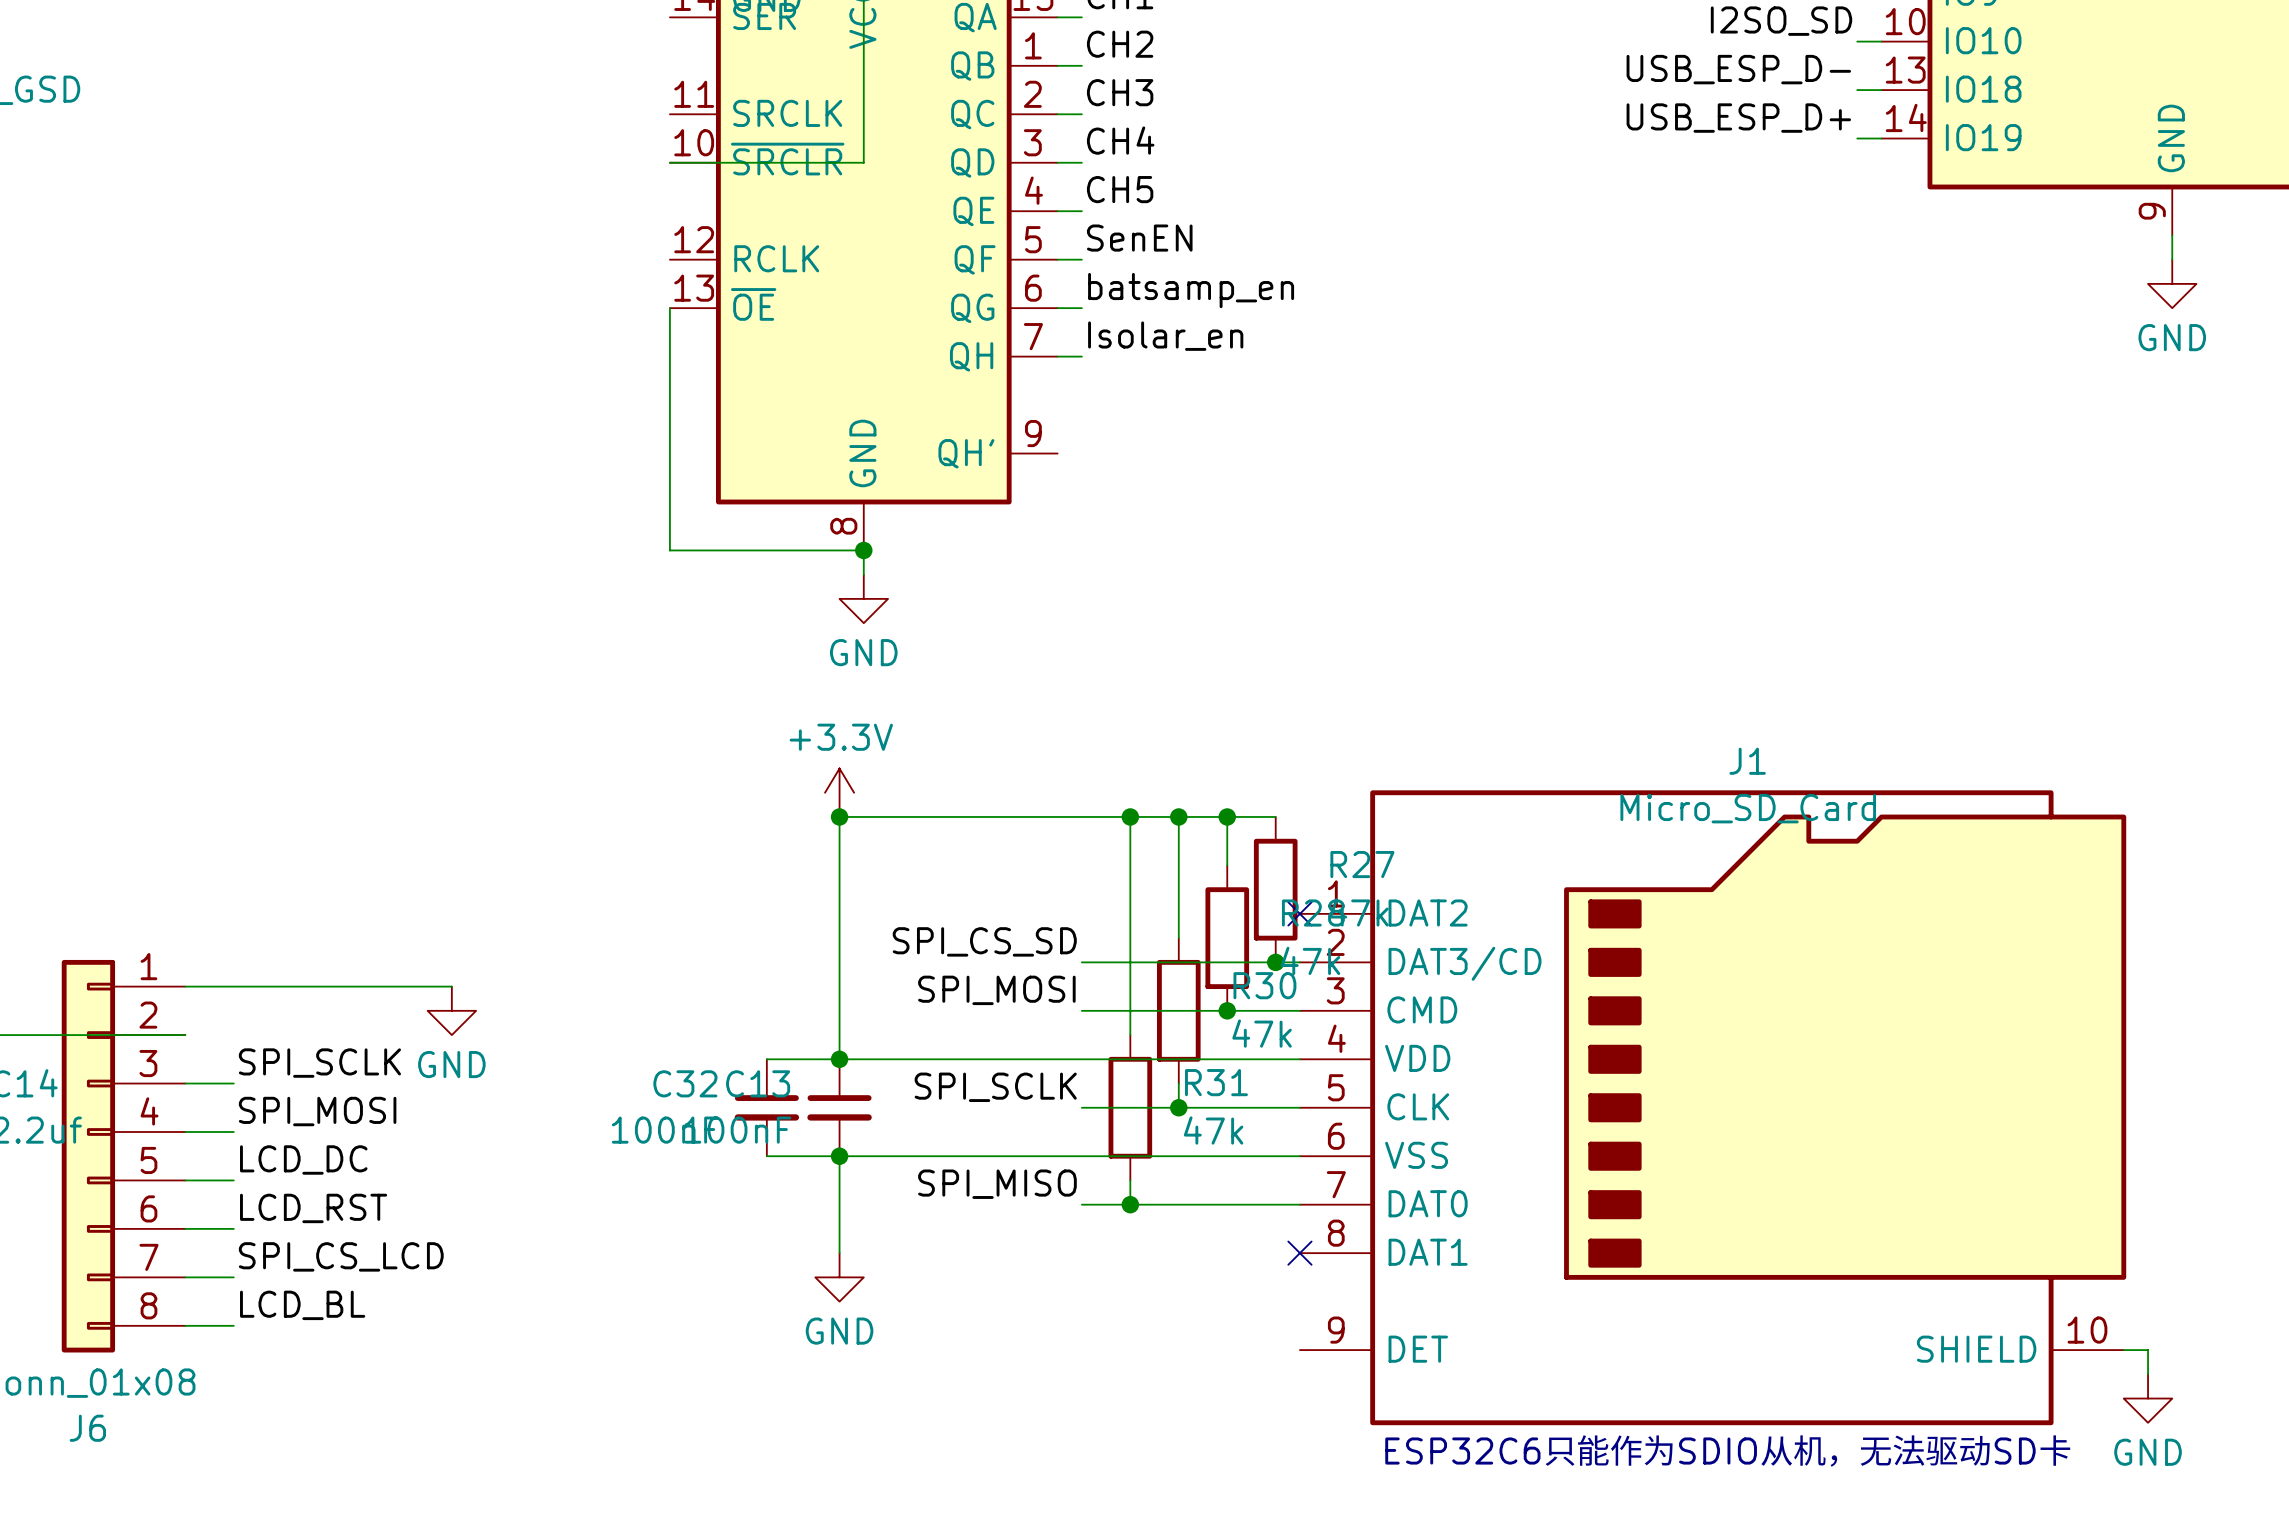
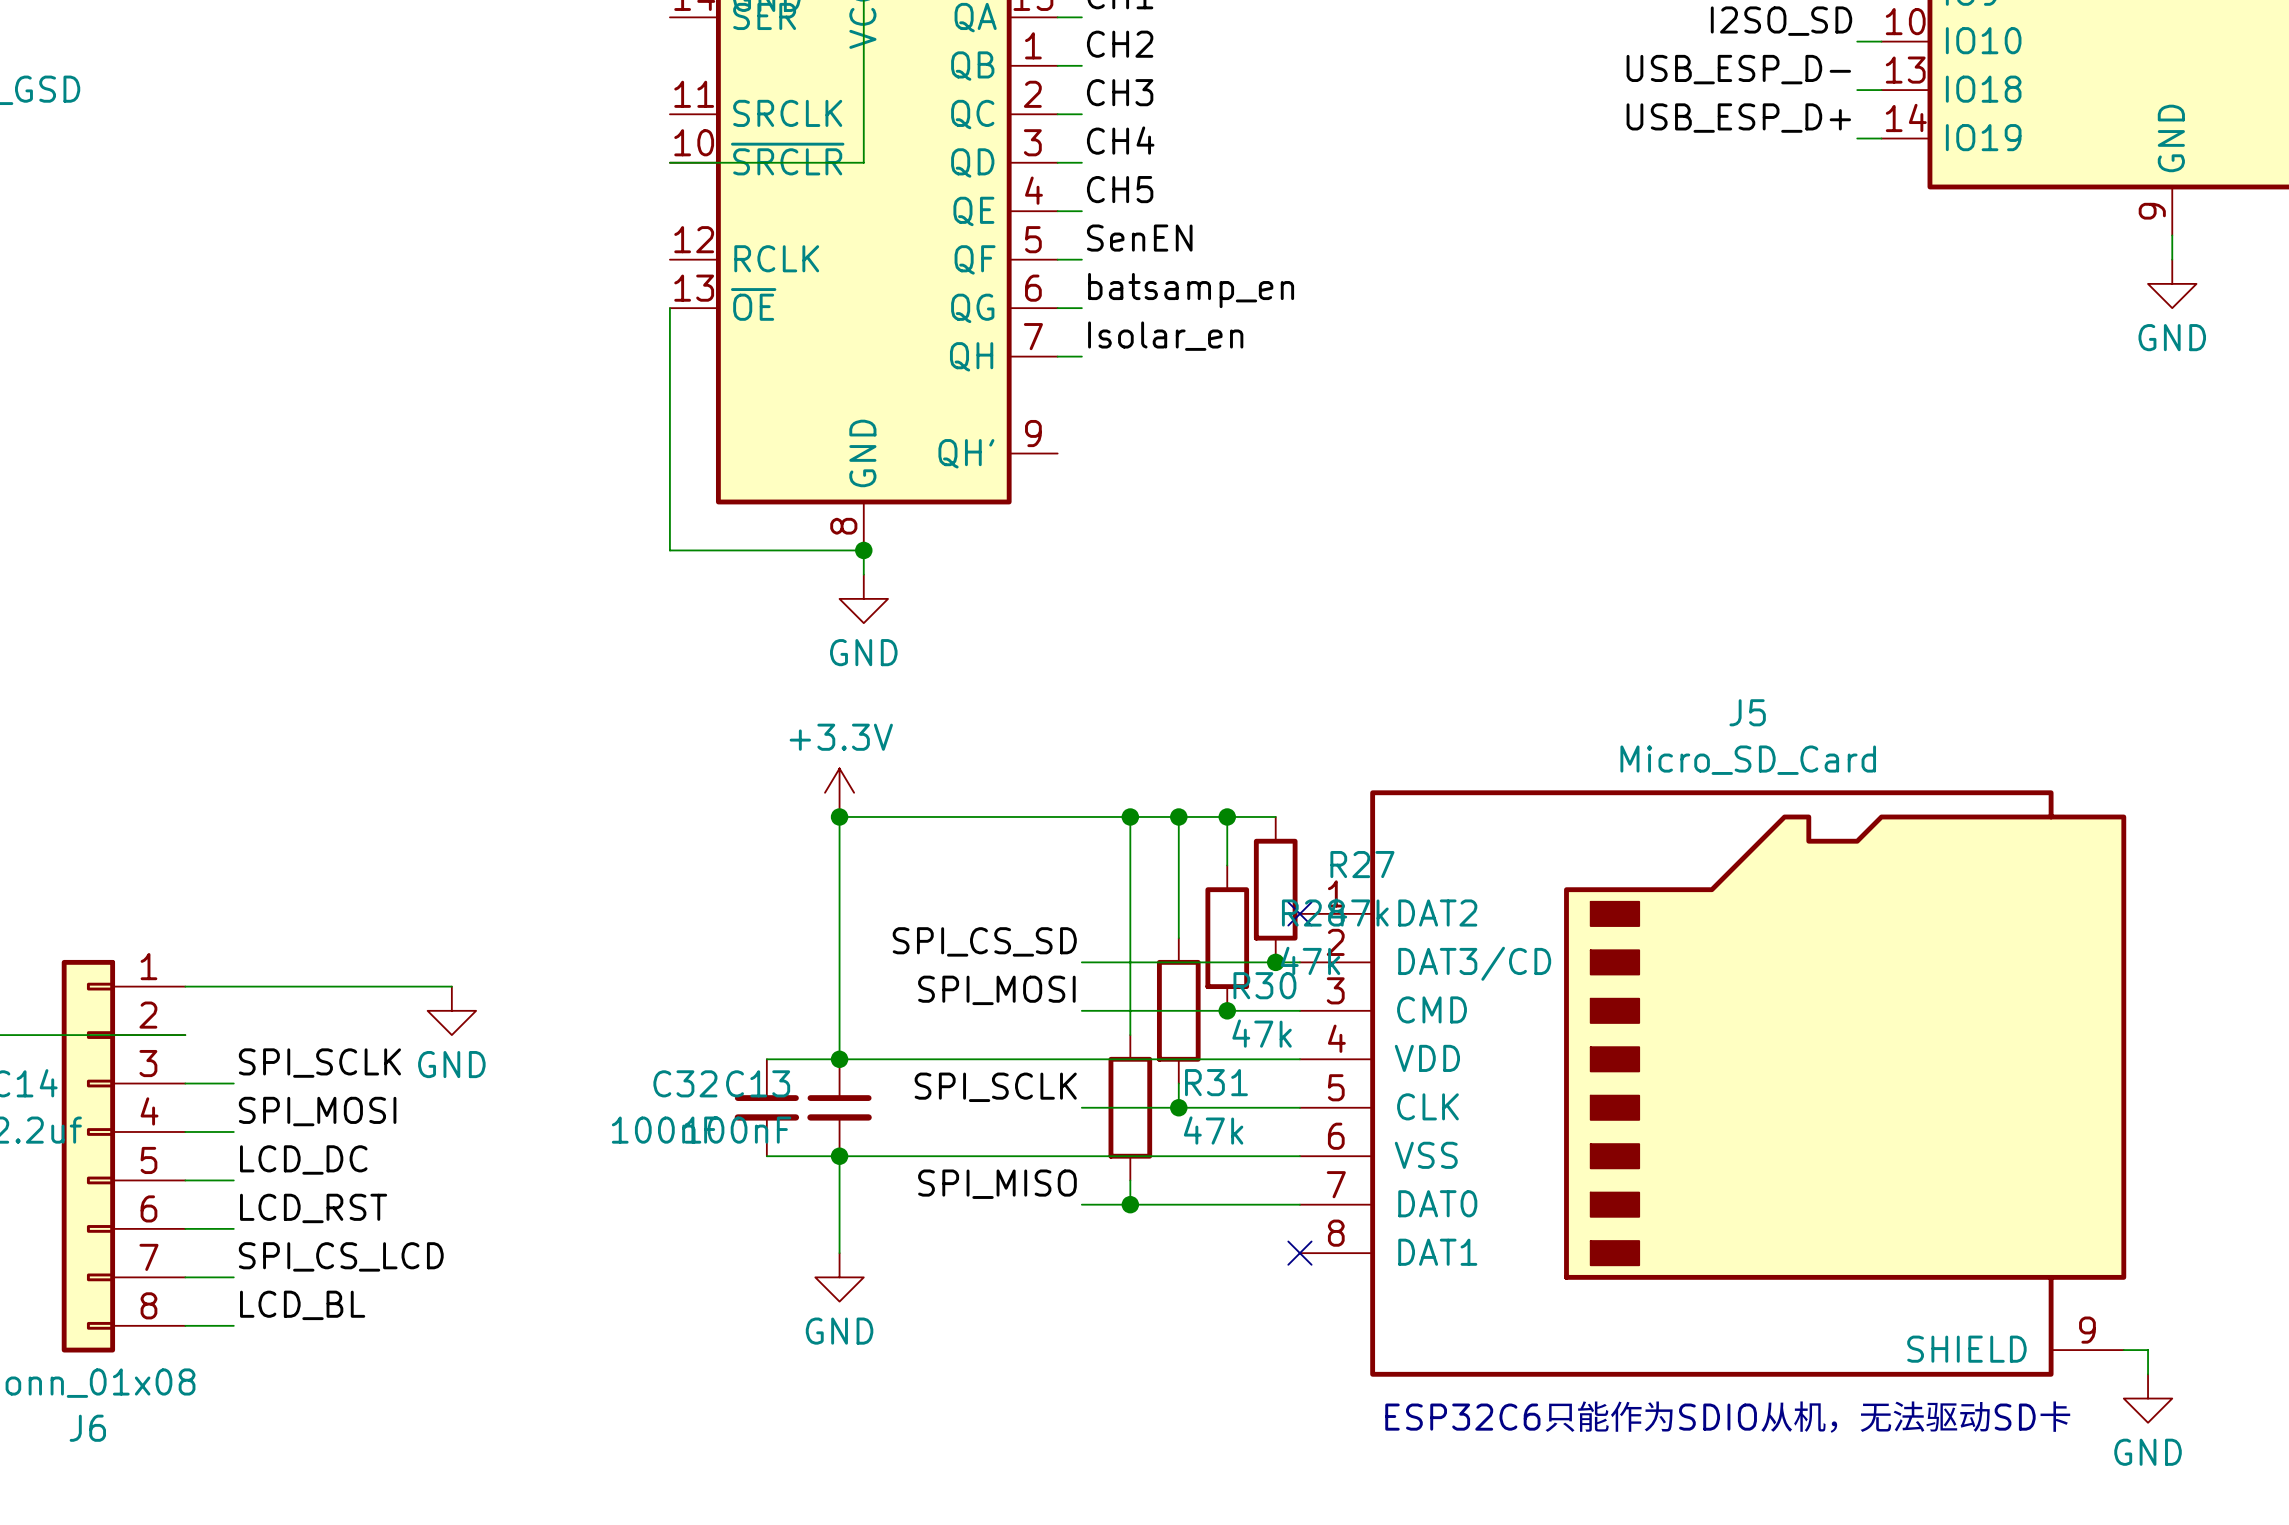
J5: none -> Micro_SD_Card (1713, 1083)
J1: Micro_SD_Card (1713, 1107) -> none
text position: ESP32C6只能作为SDIO从机，无法驱动SD卡 (1728, 1450) -> ESP32C6只能作为SDIO从机，无法驱动SD卡 (1728, 1417)

